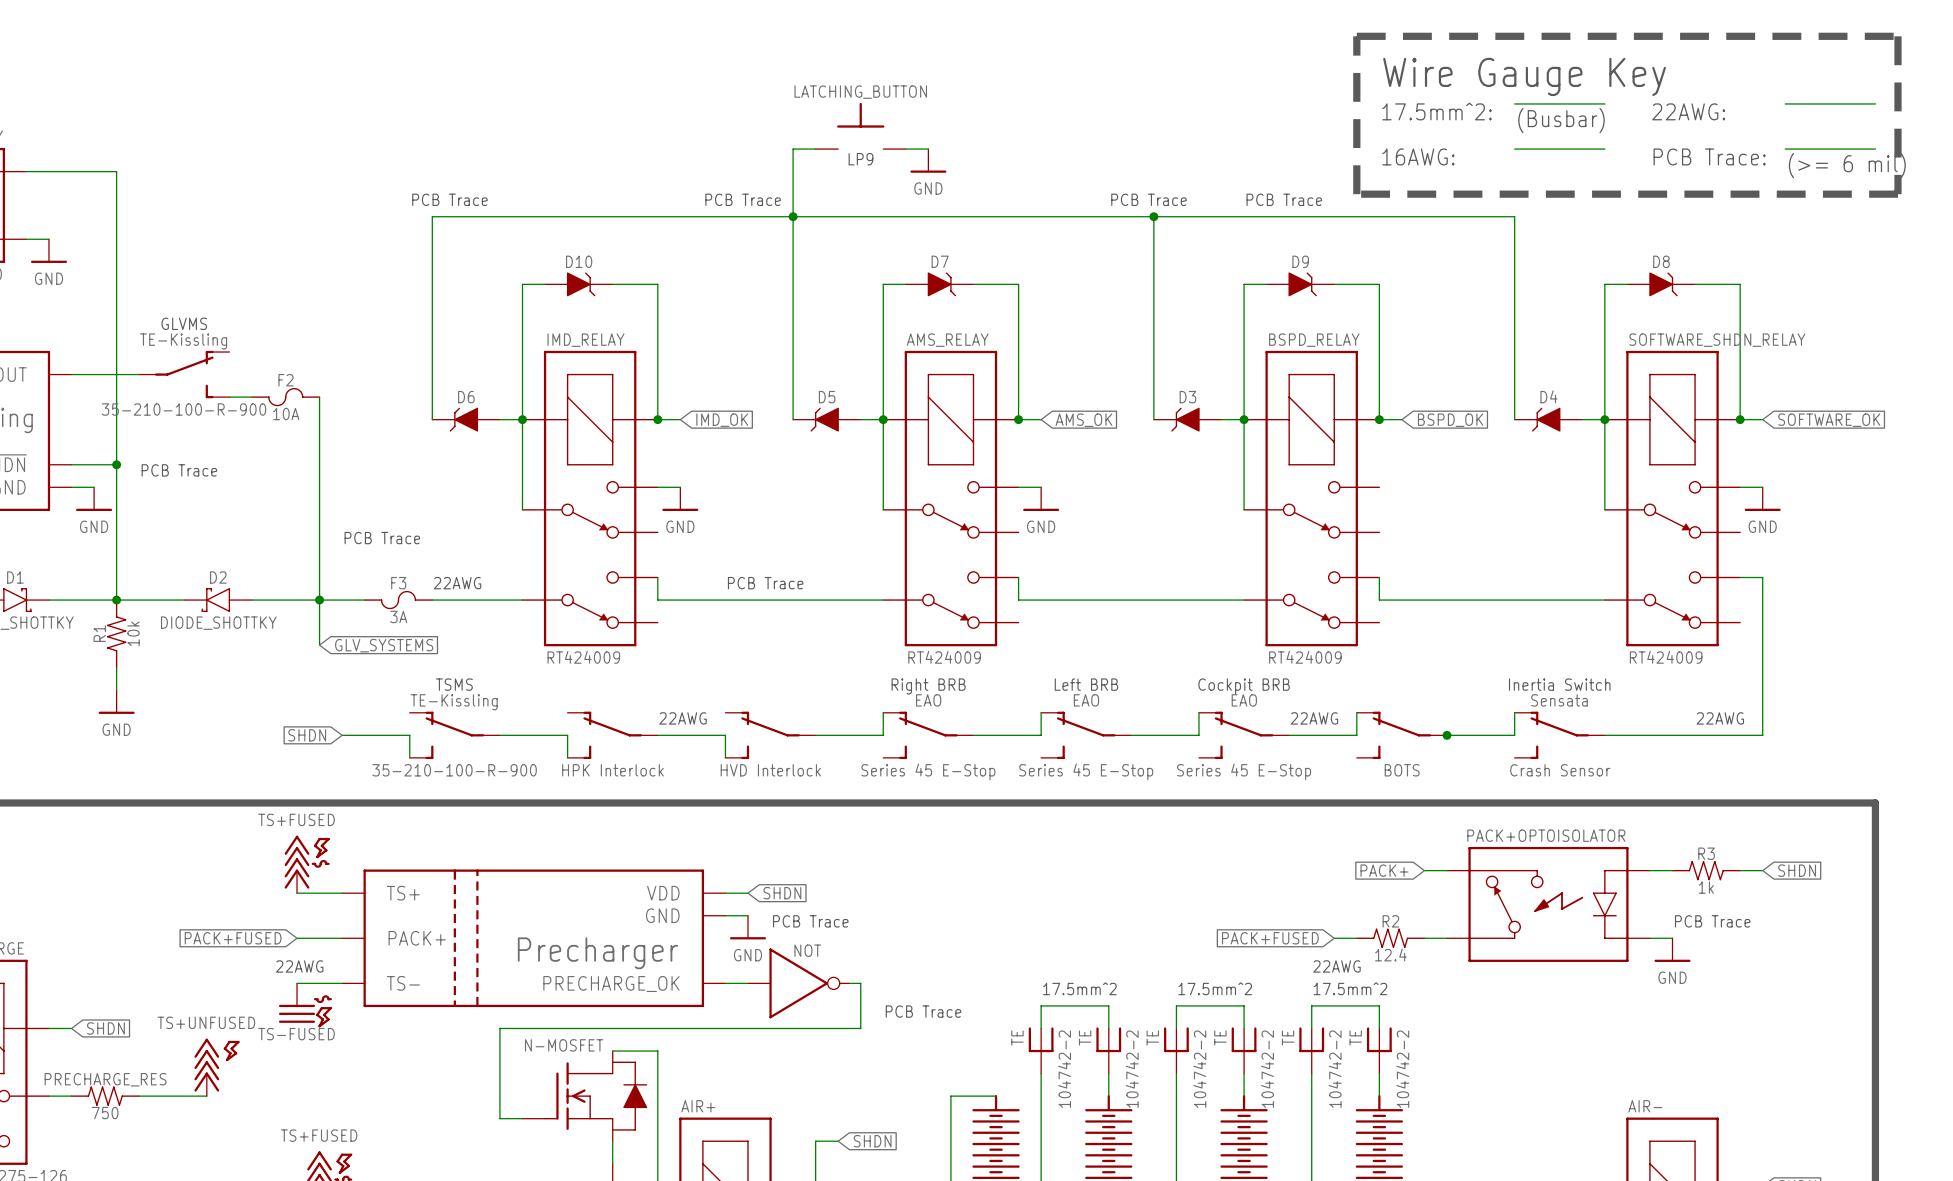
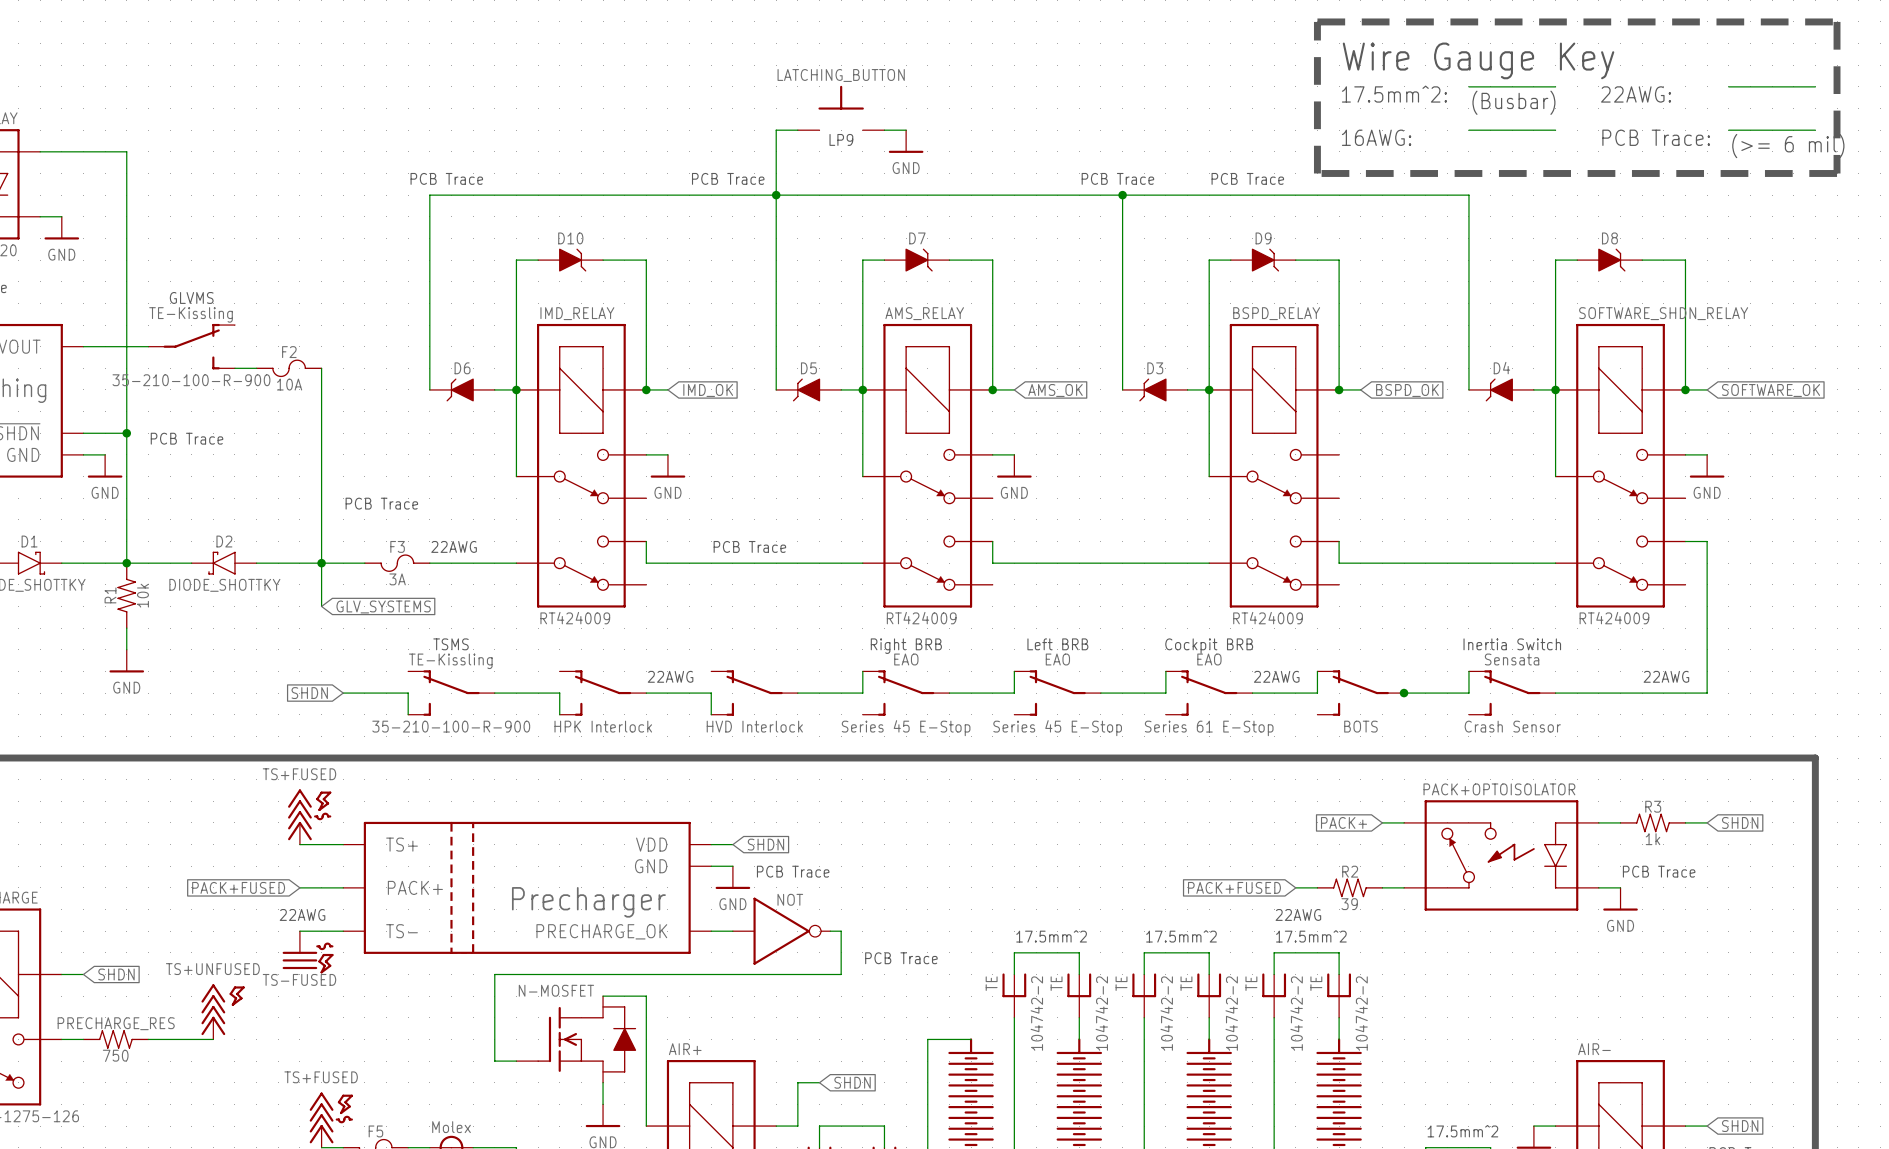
part text: Series 45 E-Stop (1244, 771) -> Series 61 E-Stop (1209, 728)
R2 value: 12.4 (1390, 954) -> 39 (1349, 904)

